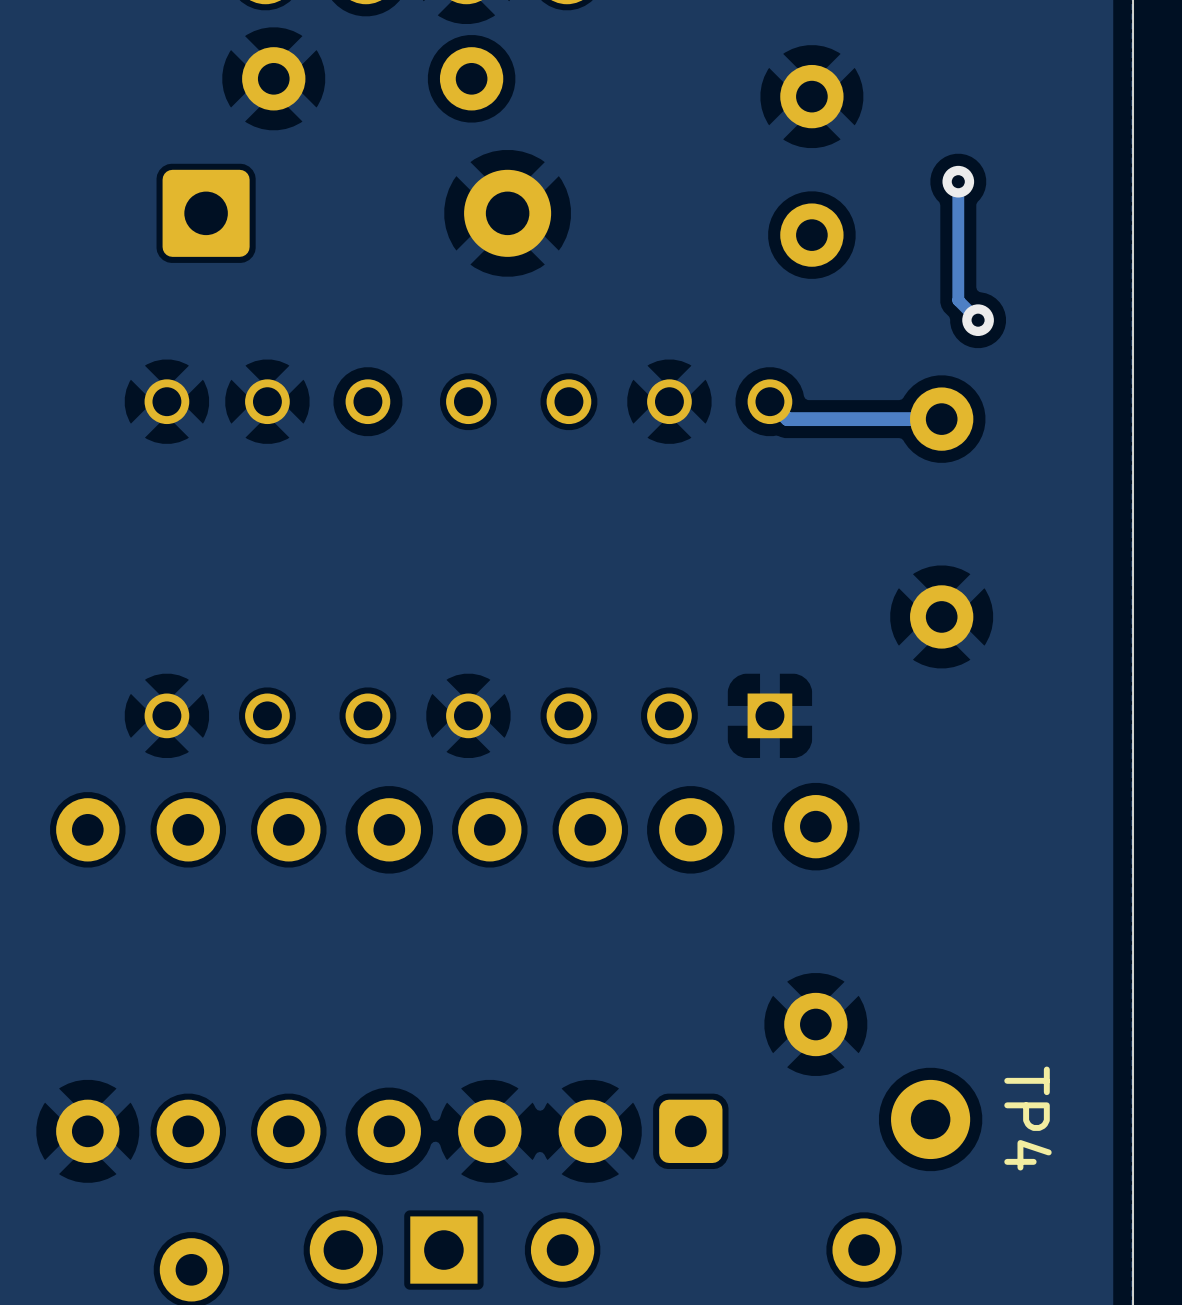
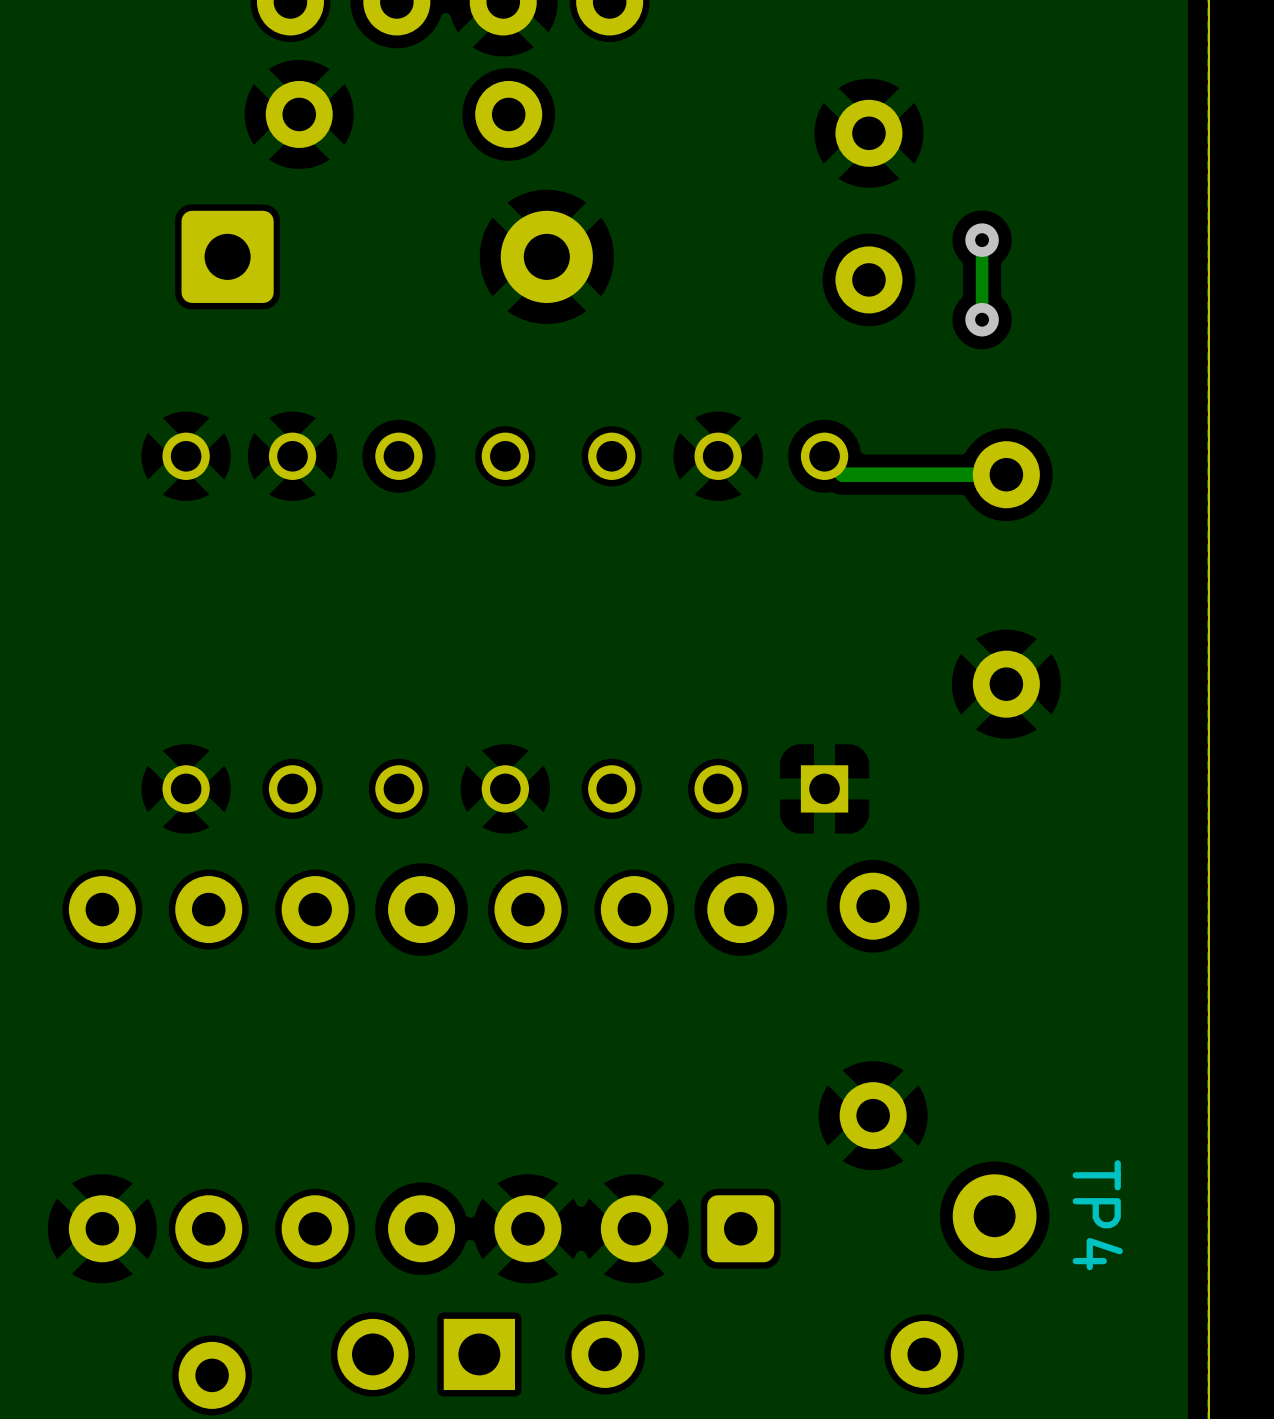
track: (958, 181) (958, 300) (978, 320) -> none
via position: (958, 181) -> (982, 240)
track: none -> (982, 243) (982, 316)
via: none -> (982, 319)
via: (978, 320) -> none

